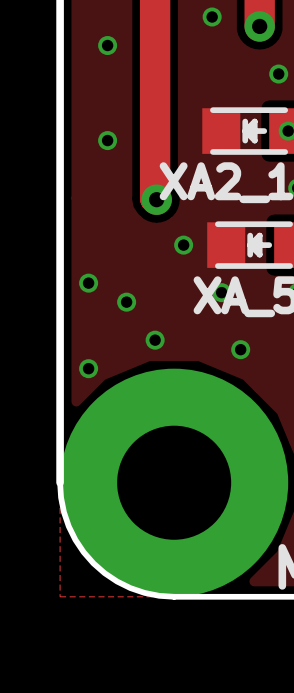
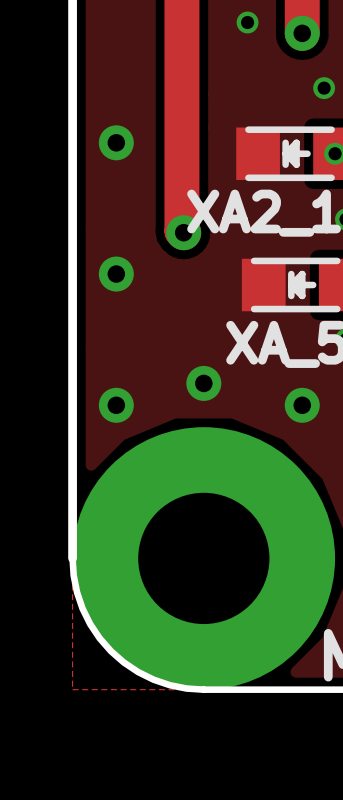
via: (107, 45) -> none
via size: [98, 131, 118, 151] -> [98, 125, 134, 161]
via: none -> (116, 274)
via: (183, 245) -> none
via: (88, 283) -> none
via: (221, 292) -> none
via: (126, 302) -> none
via size: [145, 330, 165, 350] -> [186, 365, 222, 401]
via size: [231, 340, 251, 360] -> [284, 387, 320, 423]
via size: [79, 359, 99, 379] -> [98, 387, 134, 423]

